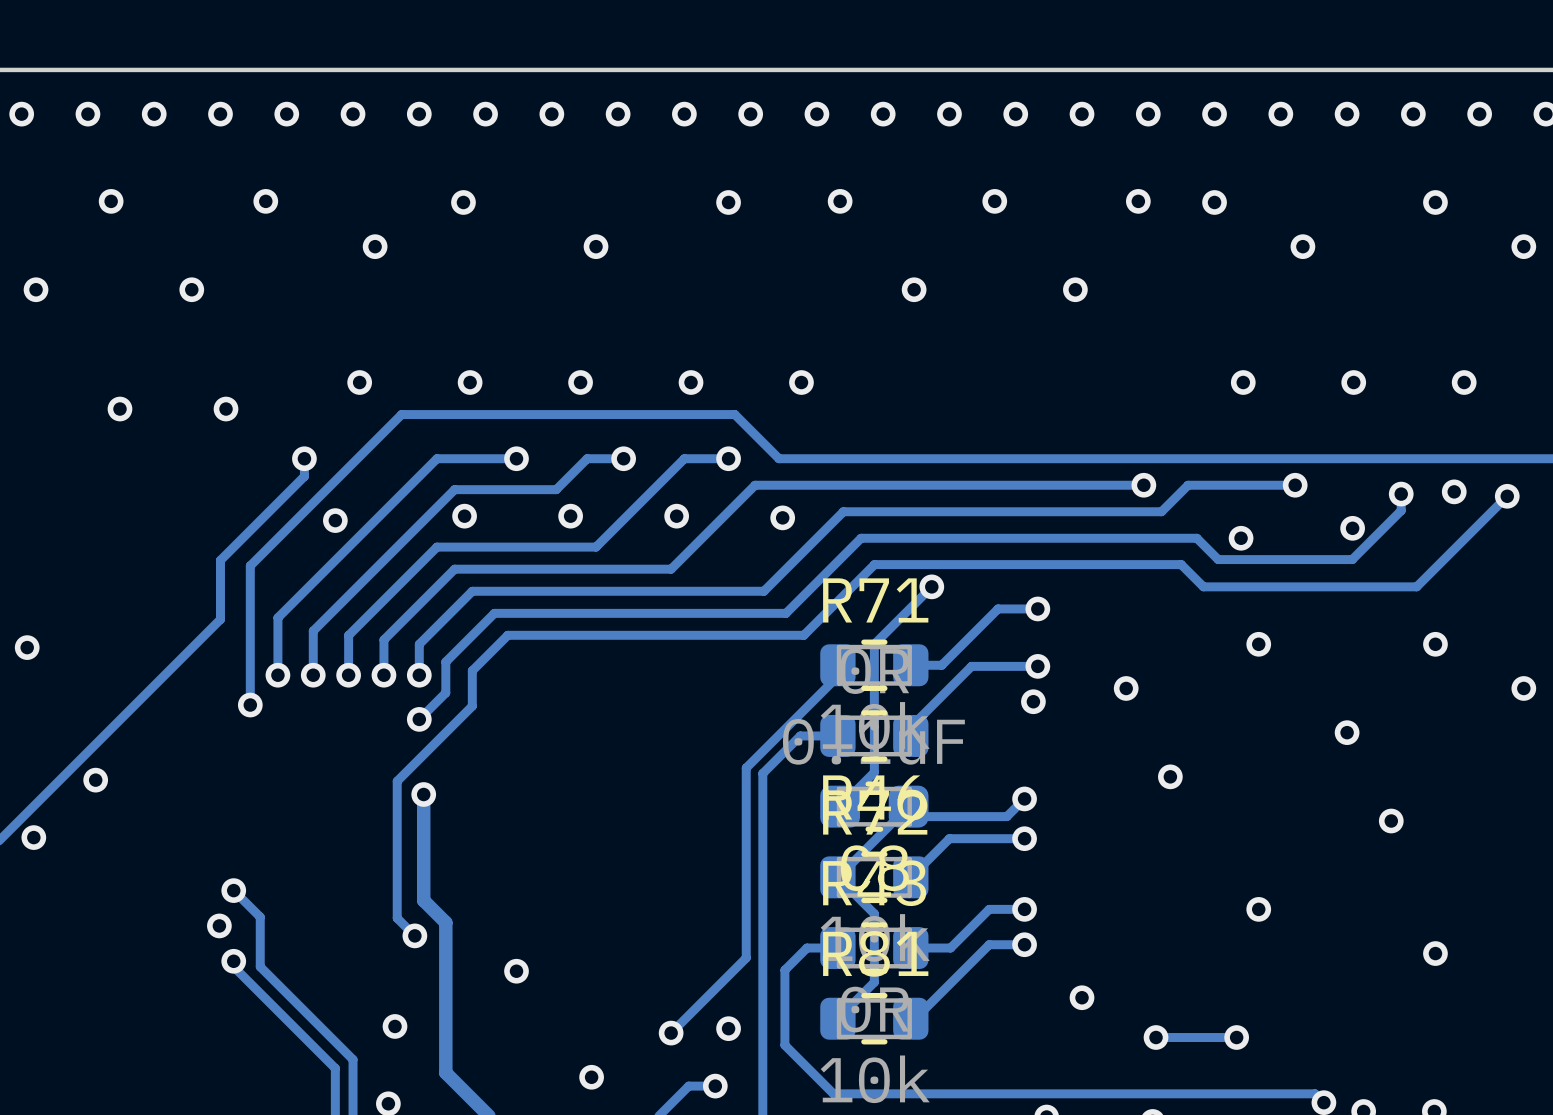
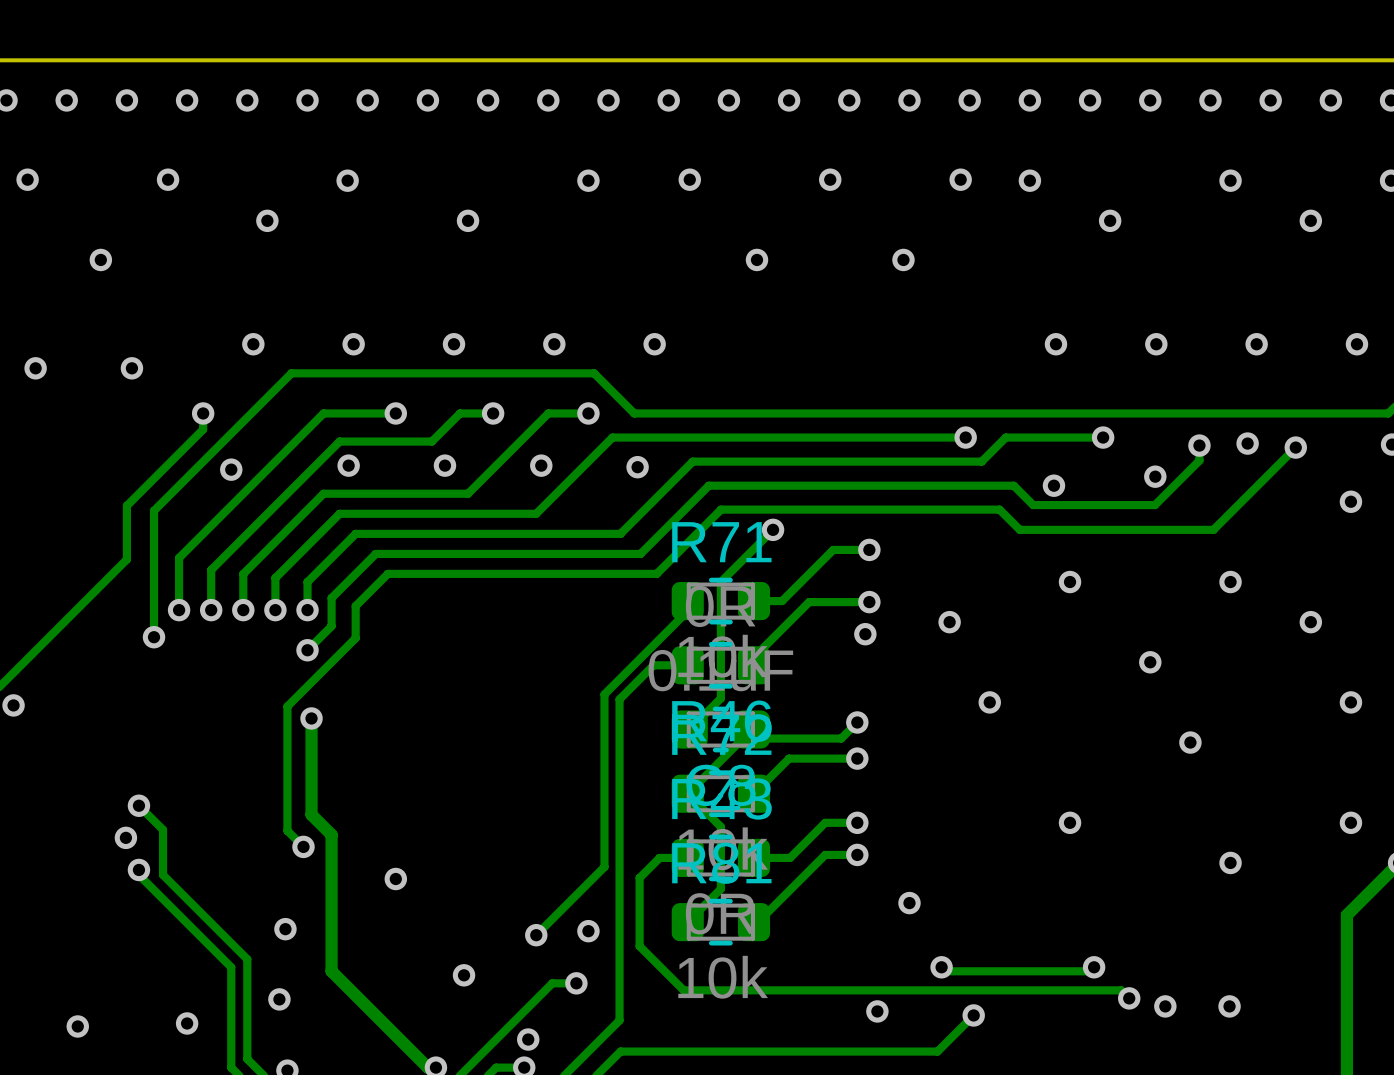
via position: (1156, 1037) -> (941, 967)
track: (1236, 1037) (1156, 1037) -> none
via position: (1236, 1037) -> (1094, 967)
track: none -> (1094, 967) (1090, 971) (945, 971) (941, 967)

